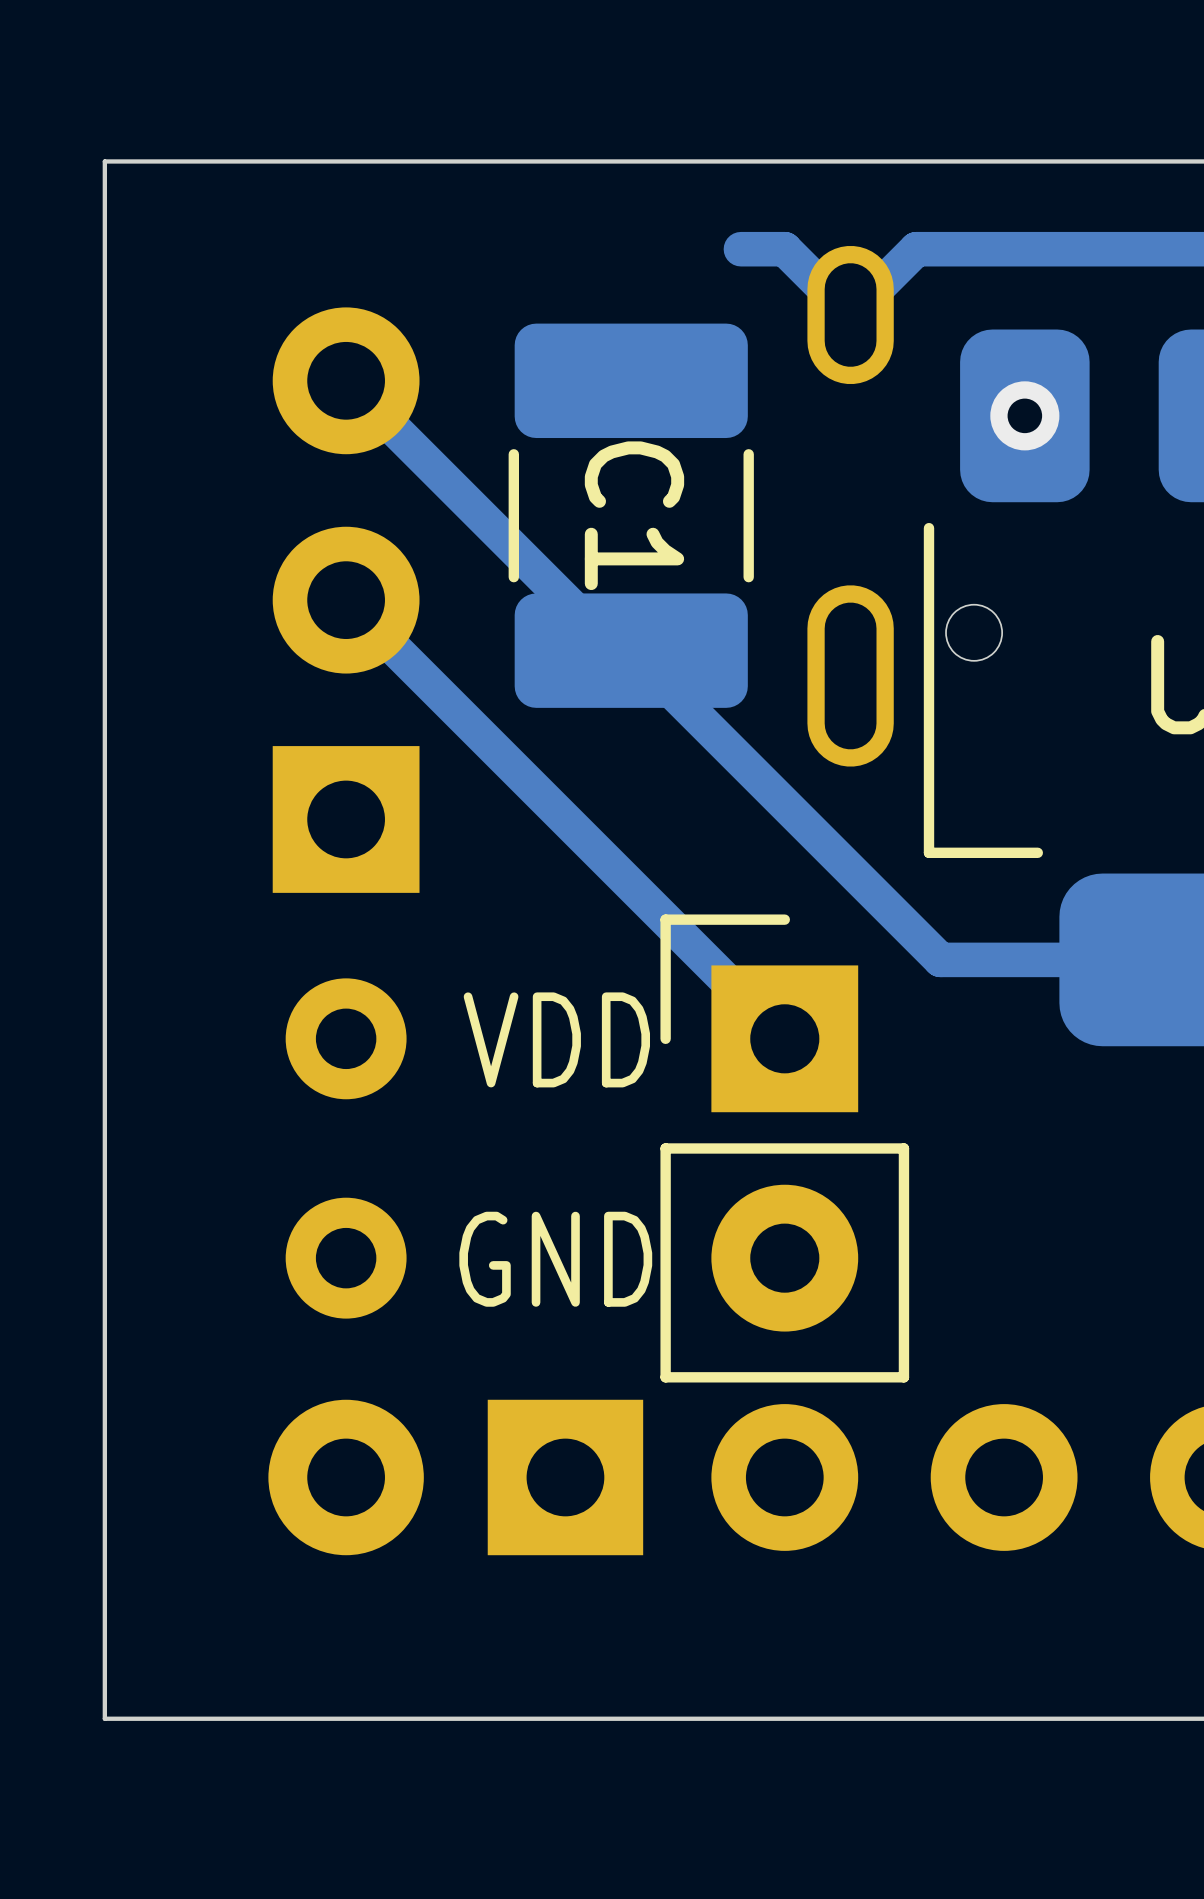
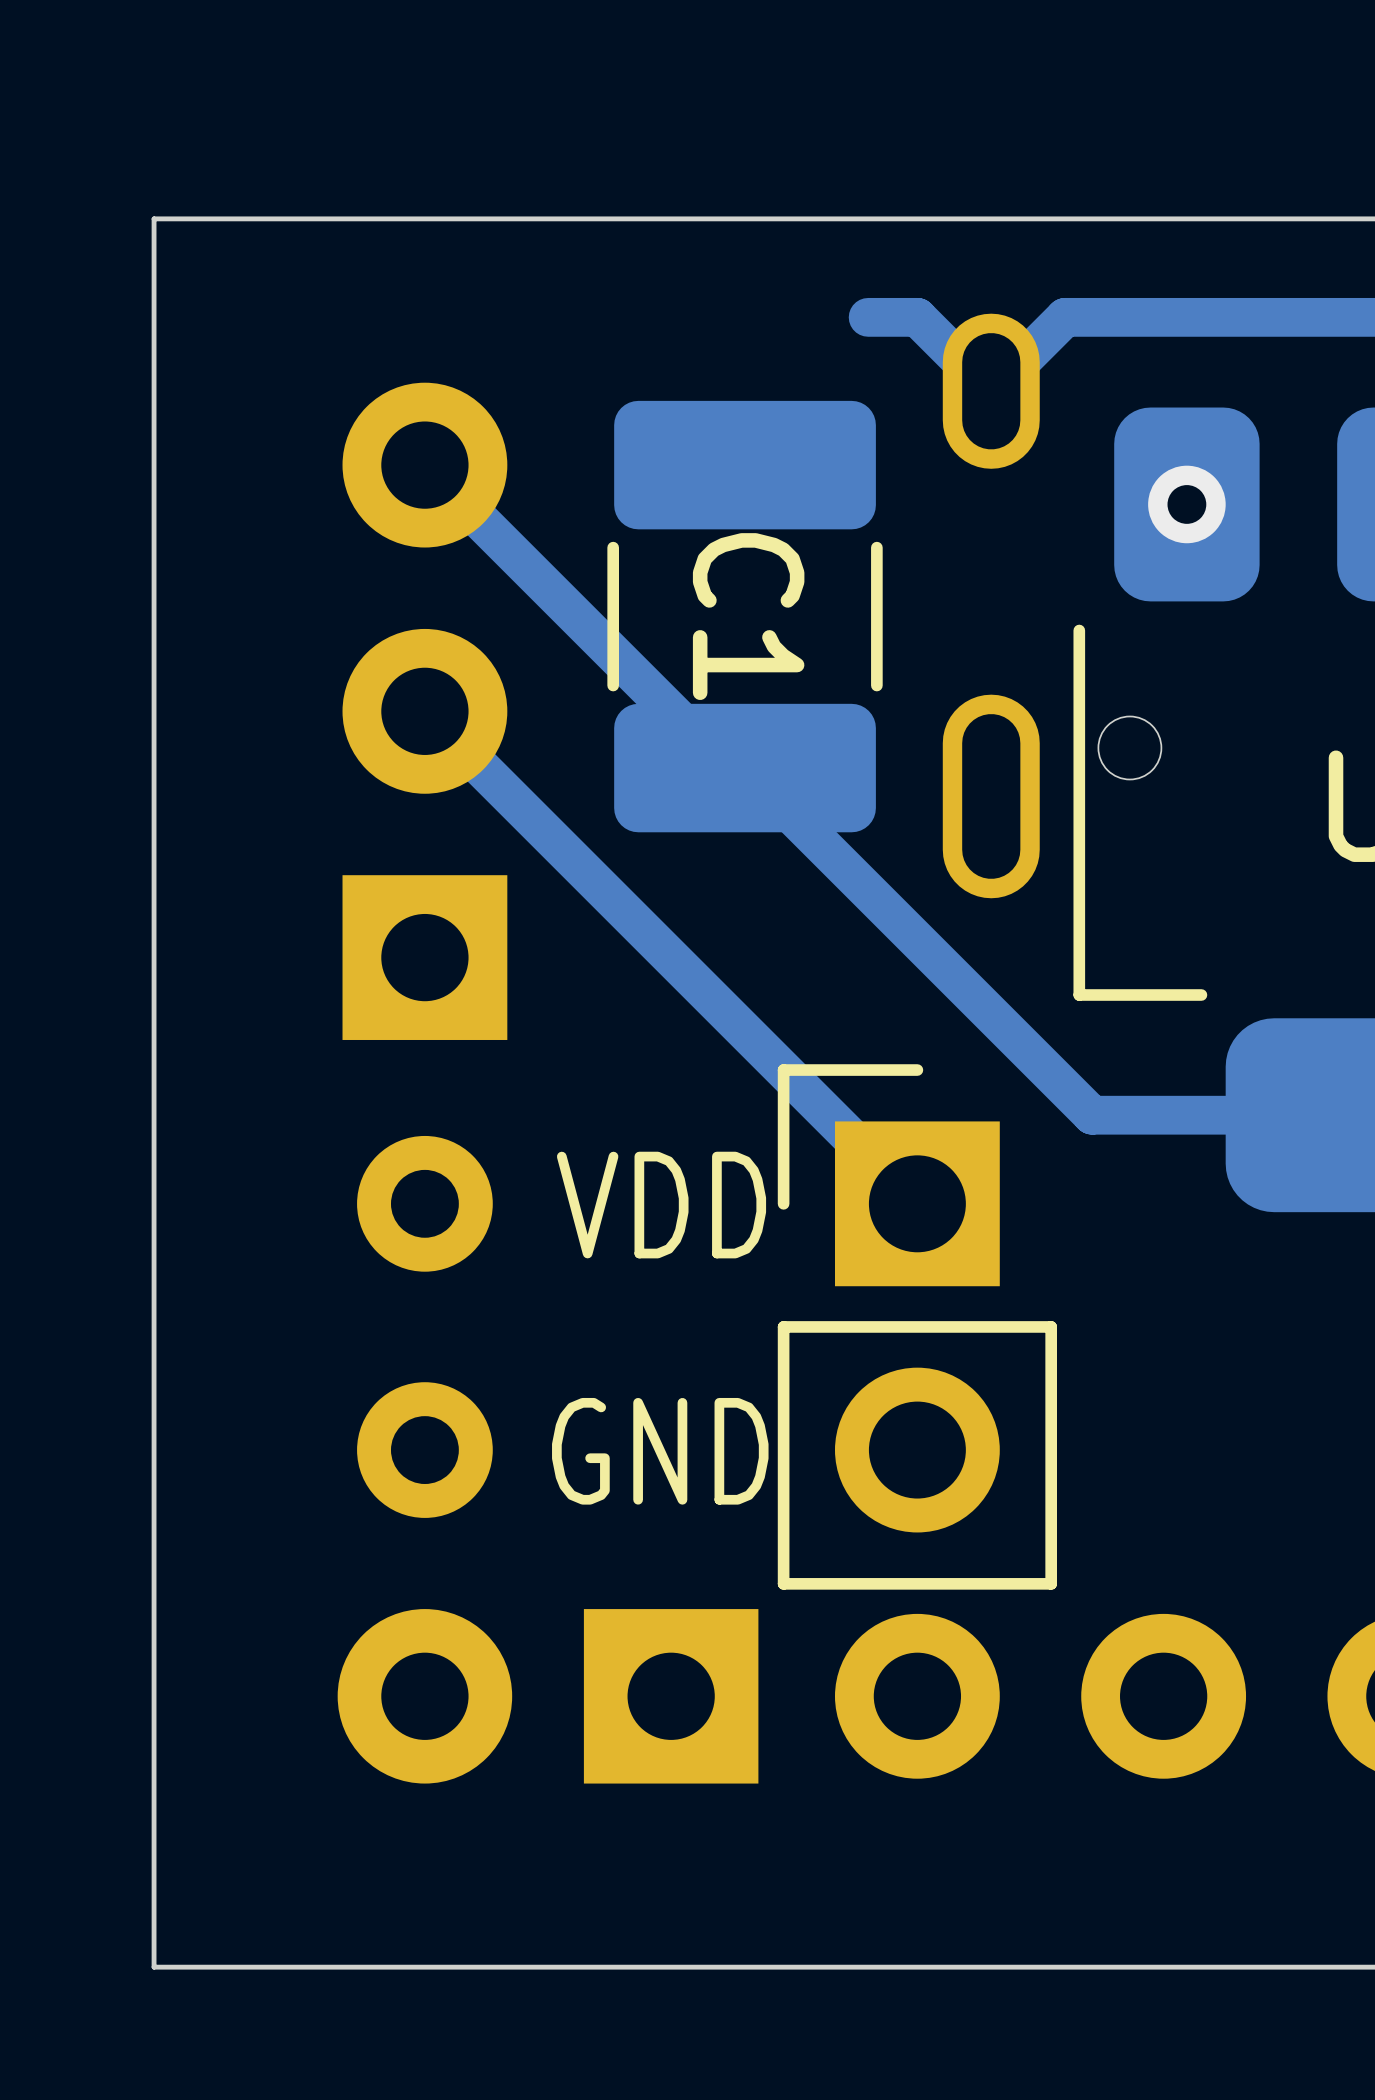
part footprint: [660, 914, 910, 1383] -> [777, 1064, 1057, 1590]

